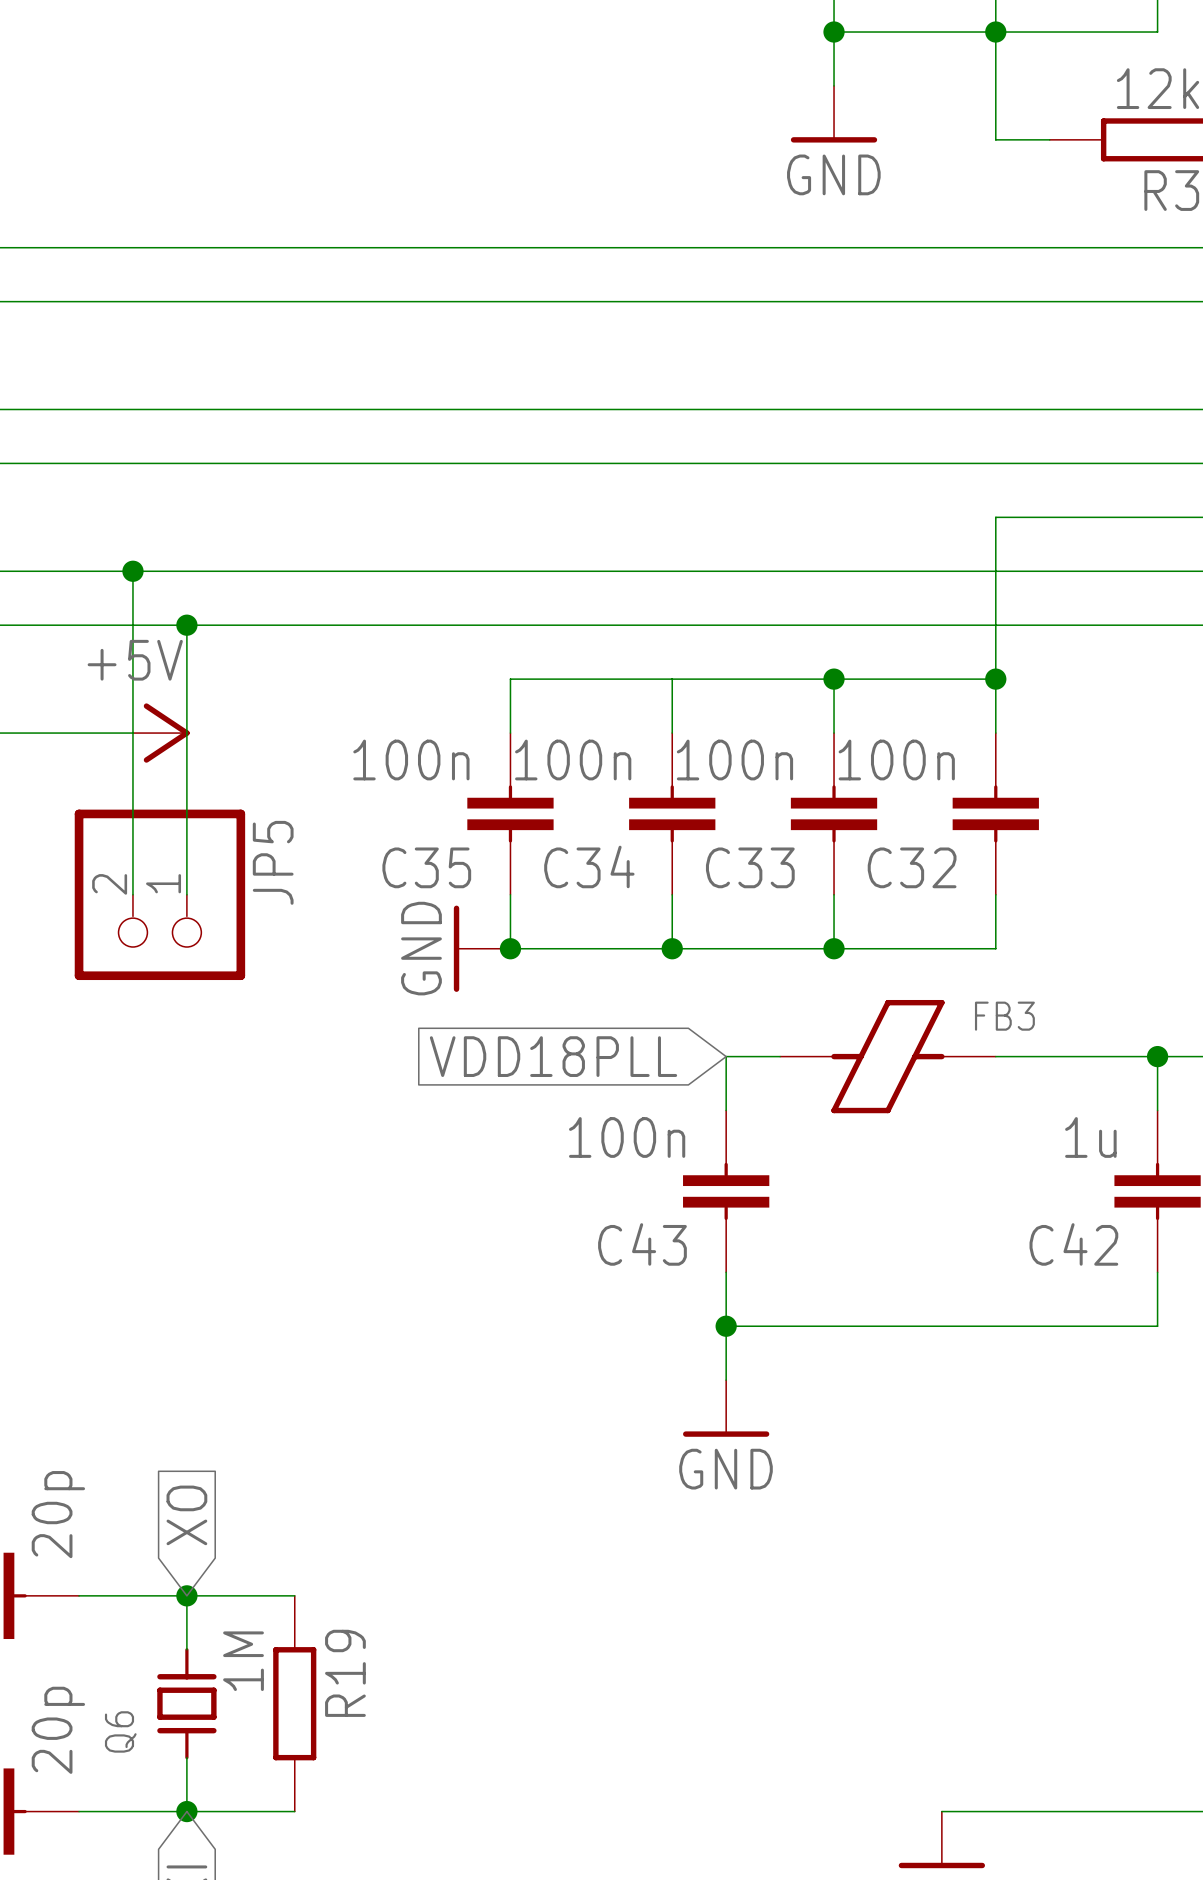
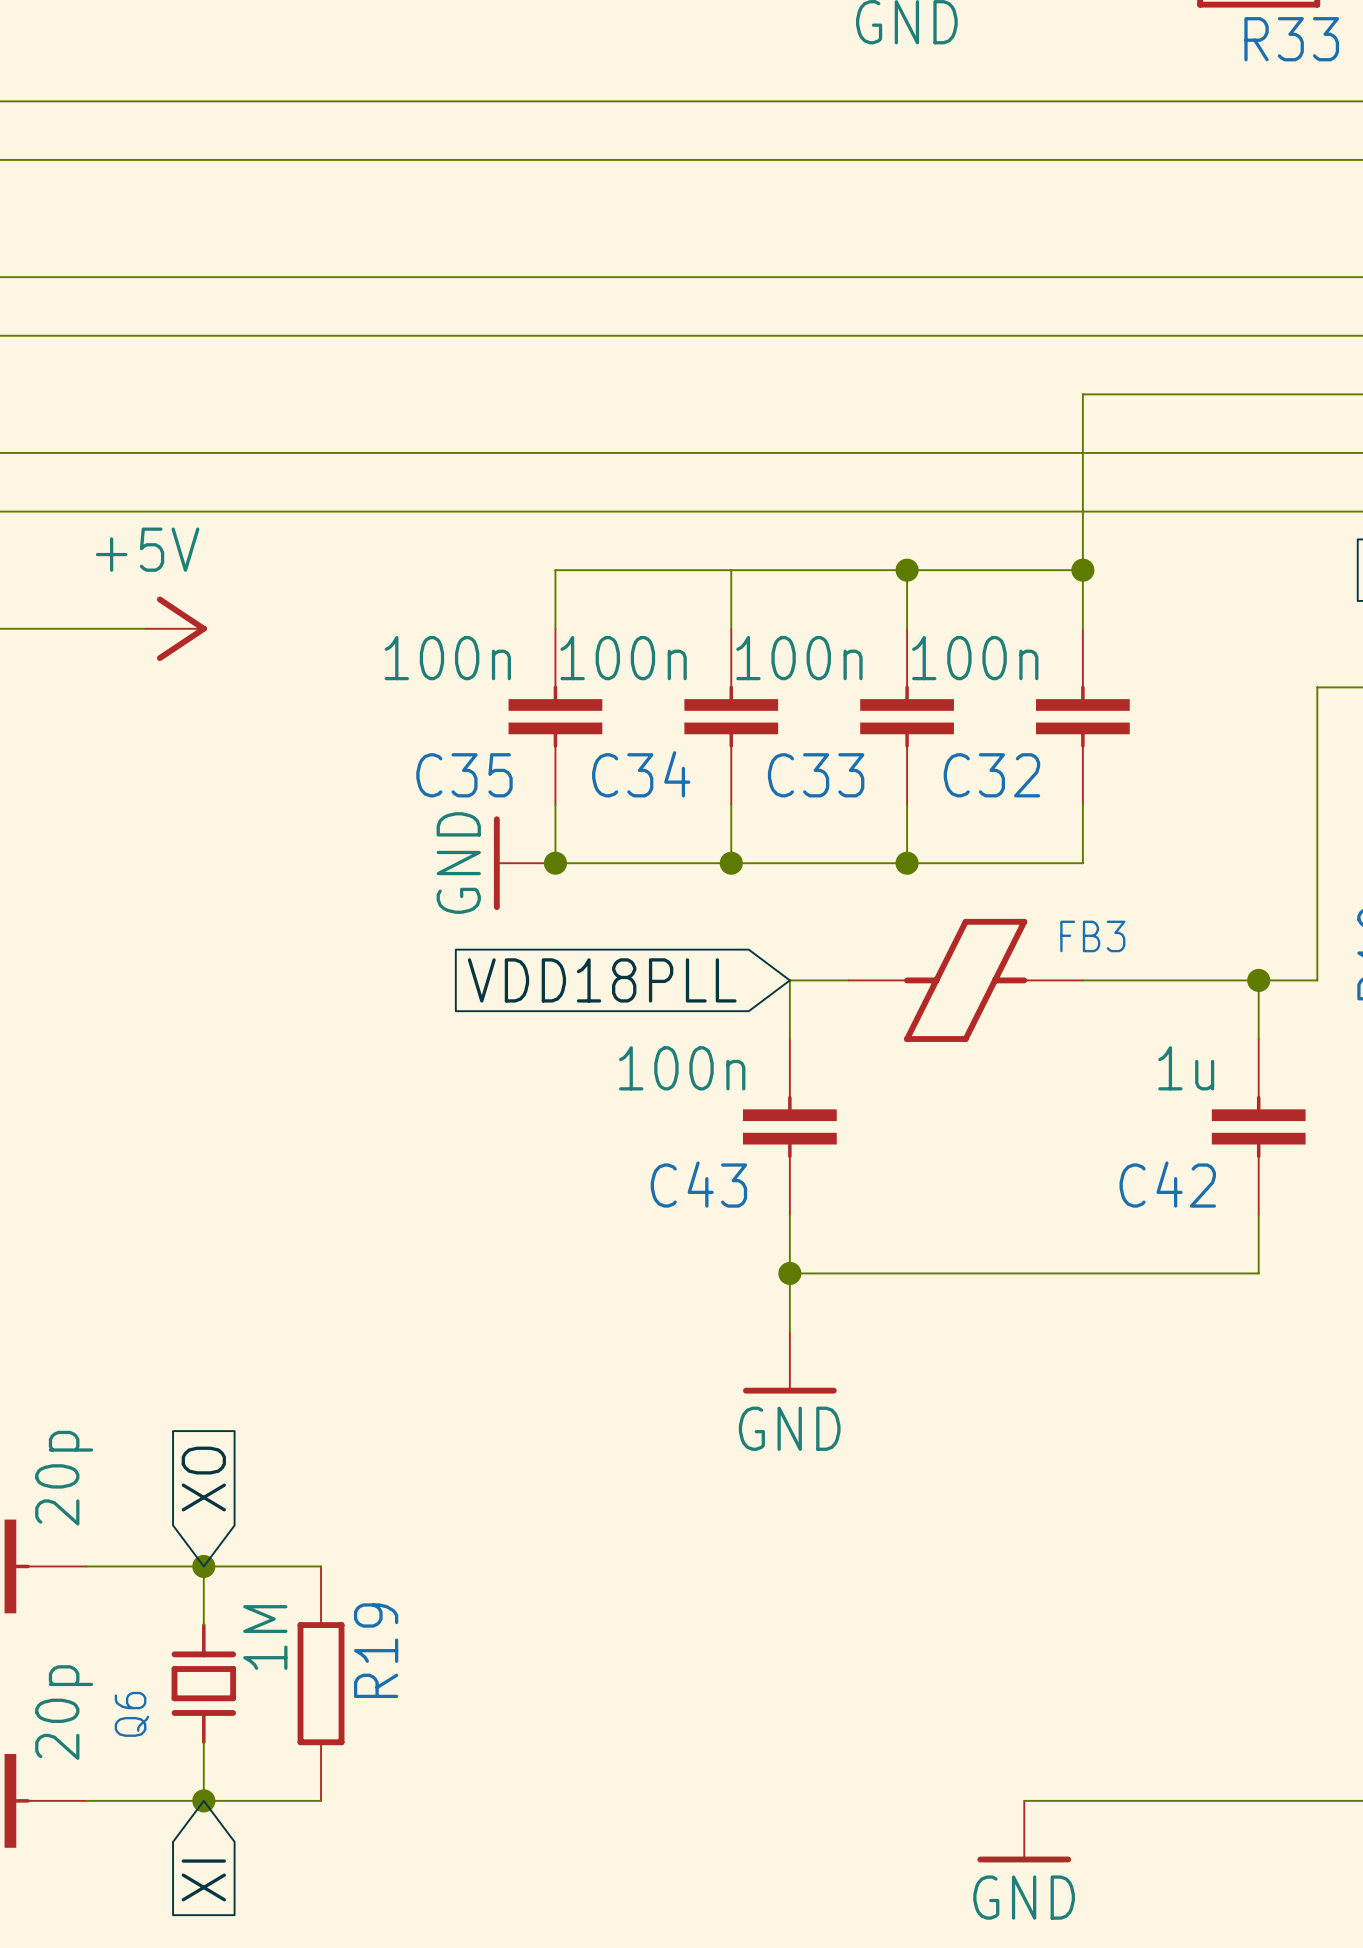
wire: (132, 571) (132, 894) -> none
junction: (132, 571) -> none
wire: (186, 625) (186, 894) -> none
junction: (186, 625) -> none
JP5: (159, 894) -> none

